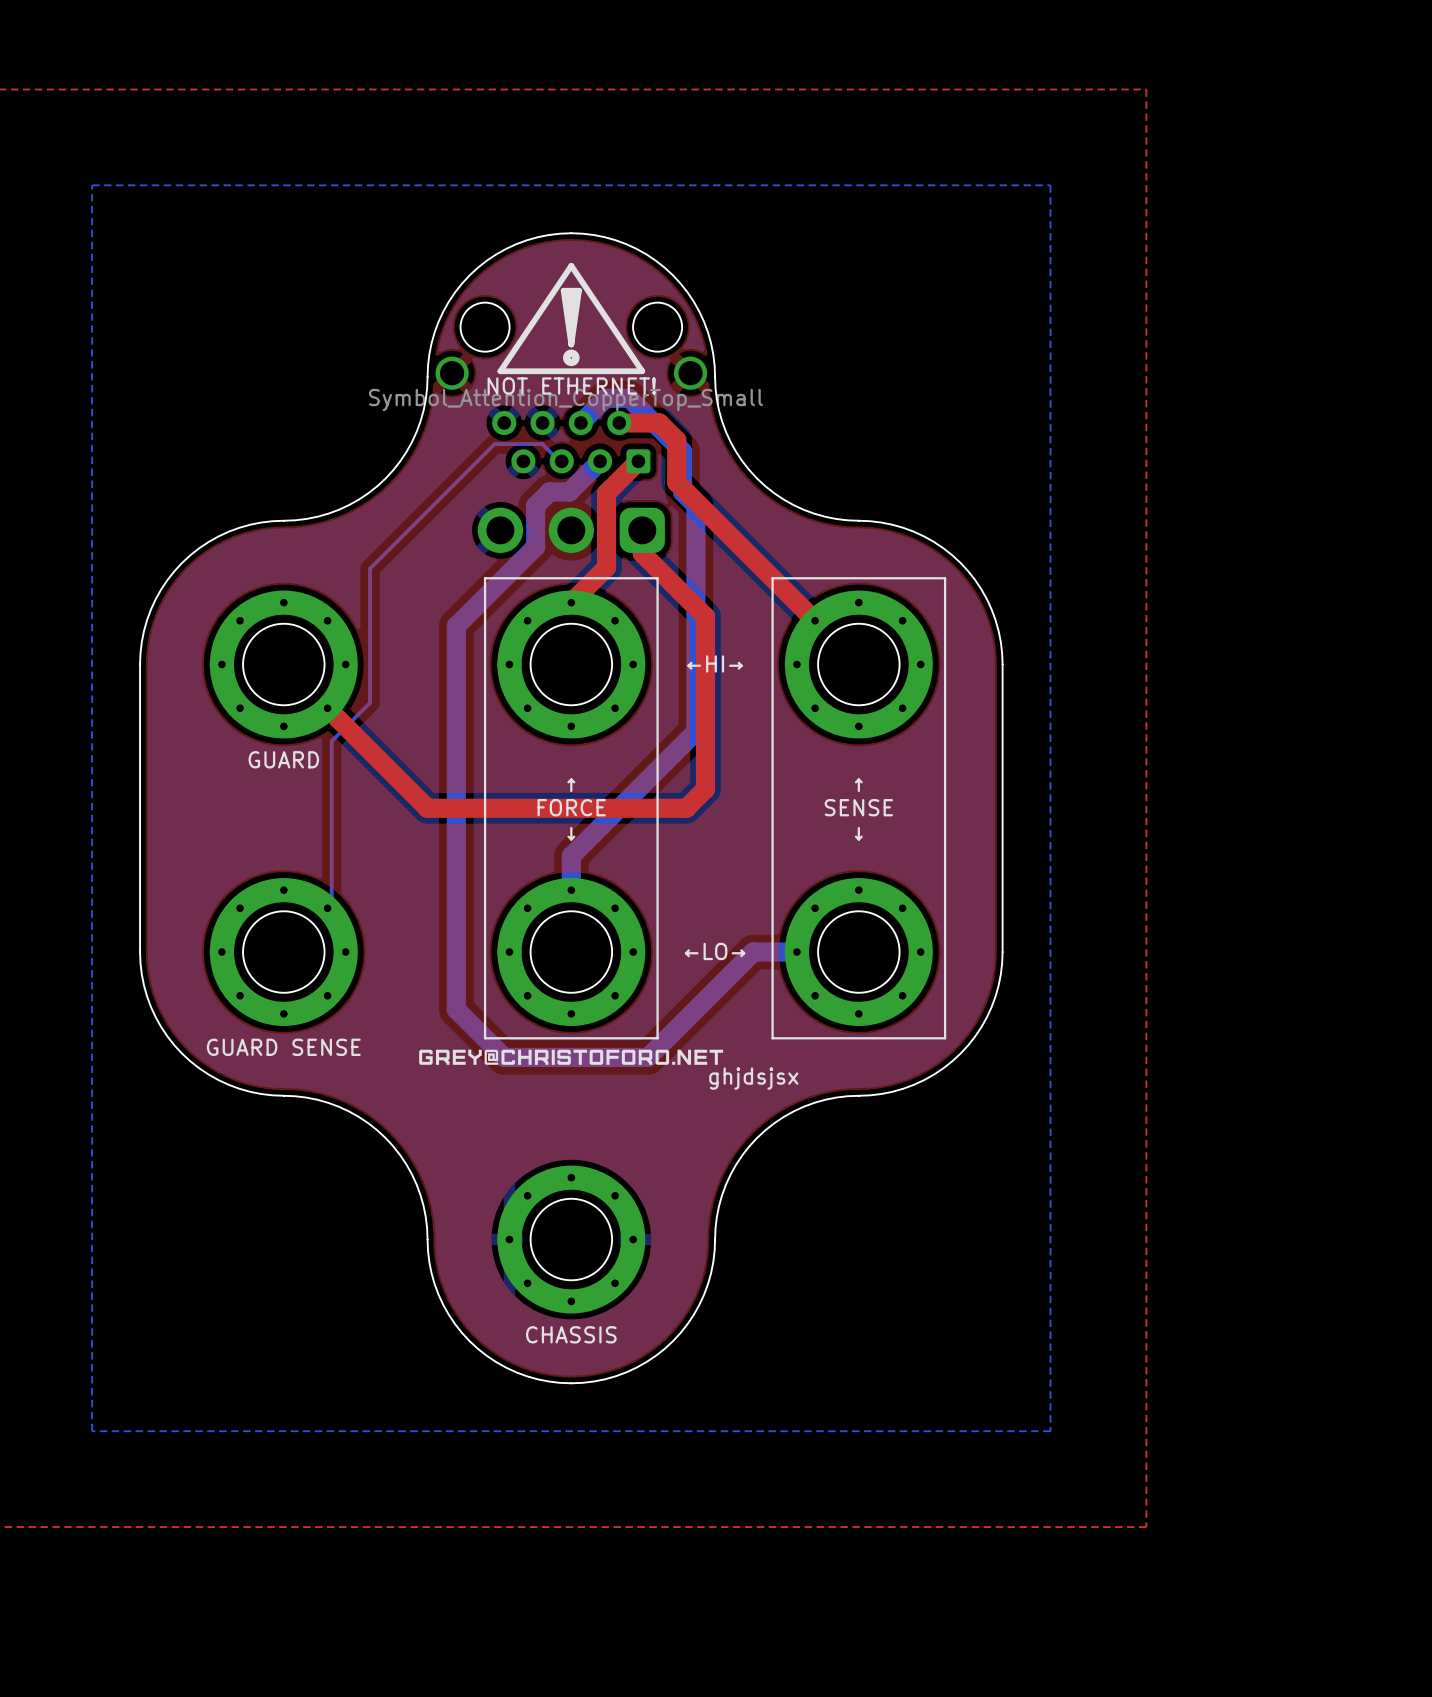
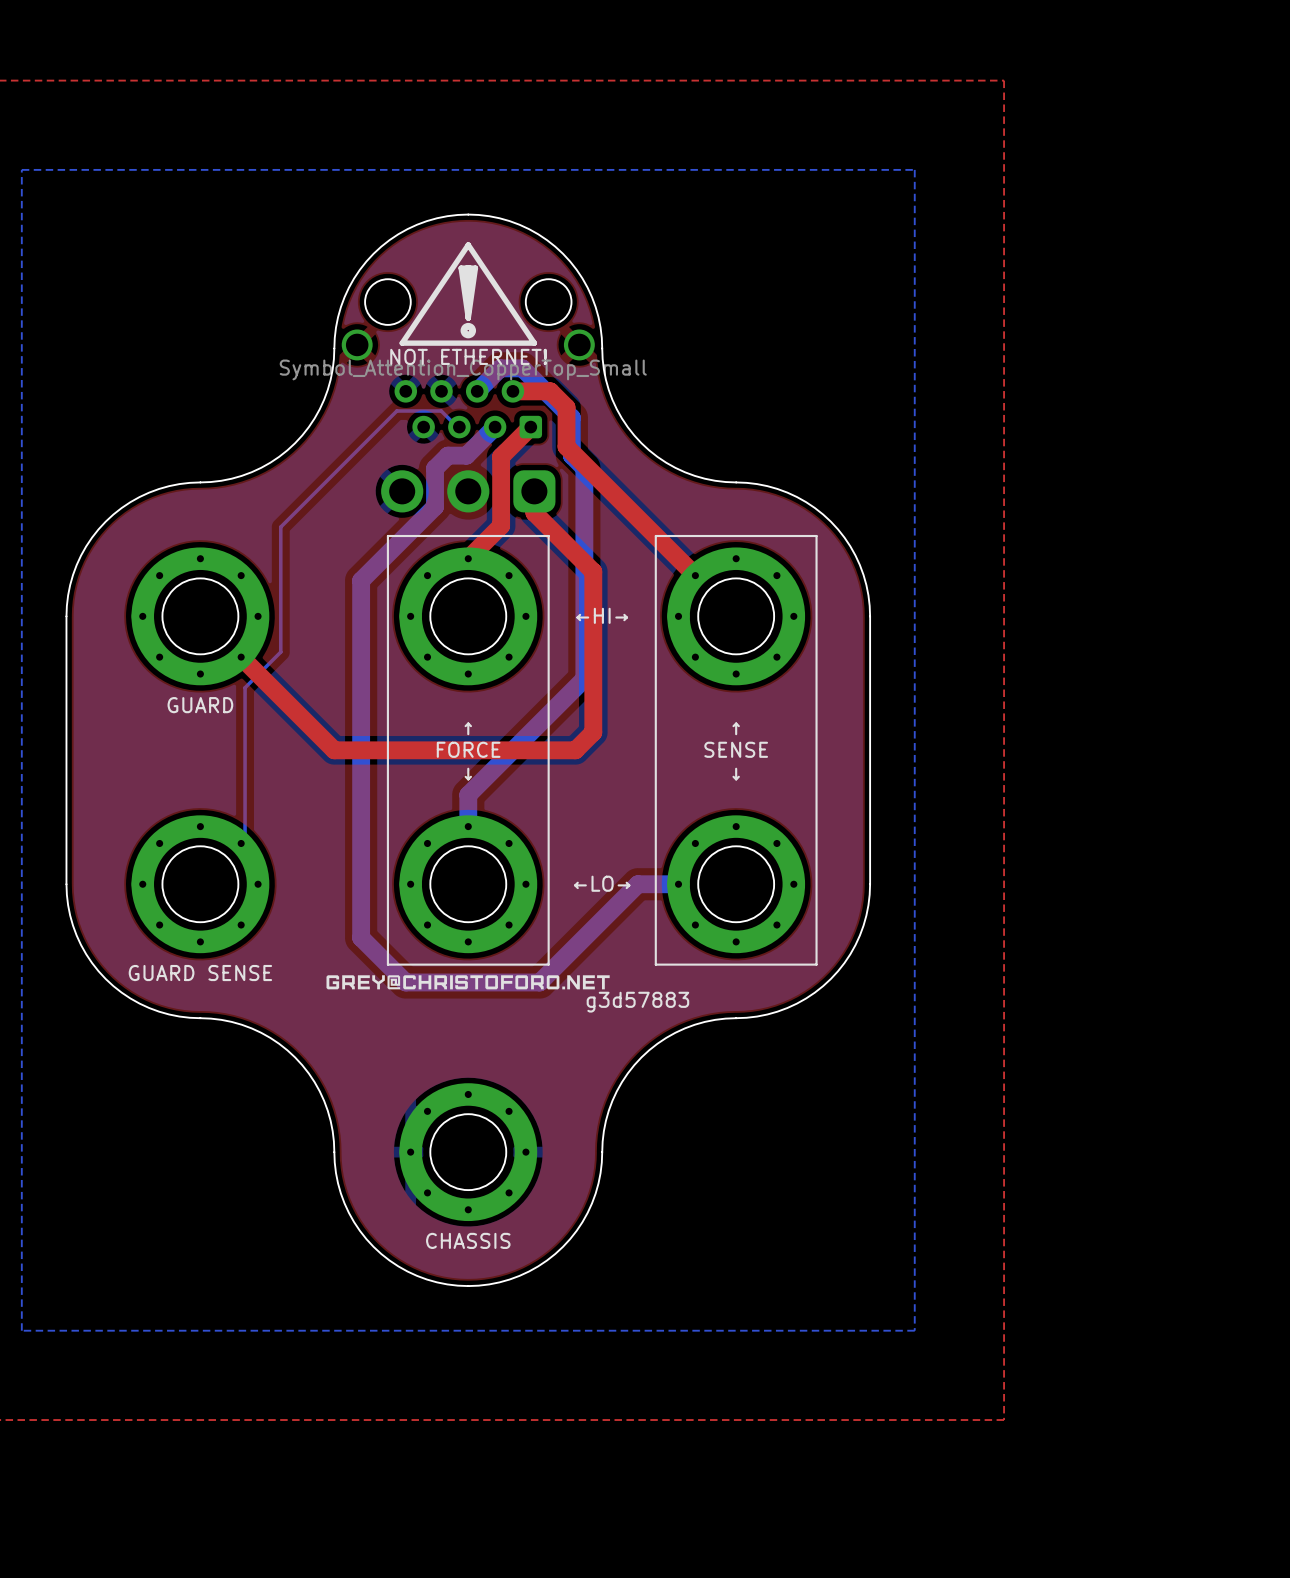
text: ghjdsjsx (753, 1078) -> g3d57883 (637, 1002)

